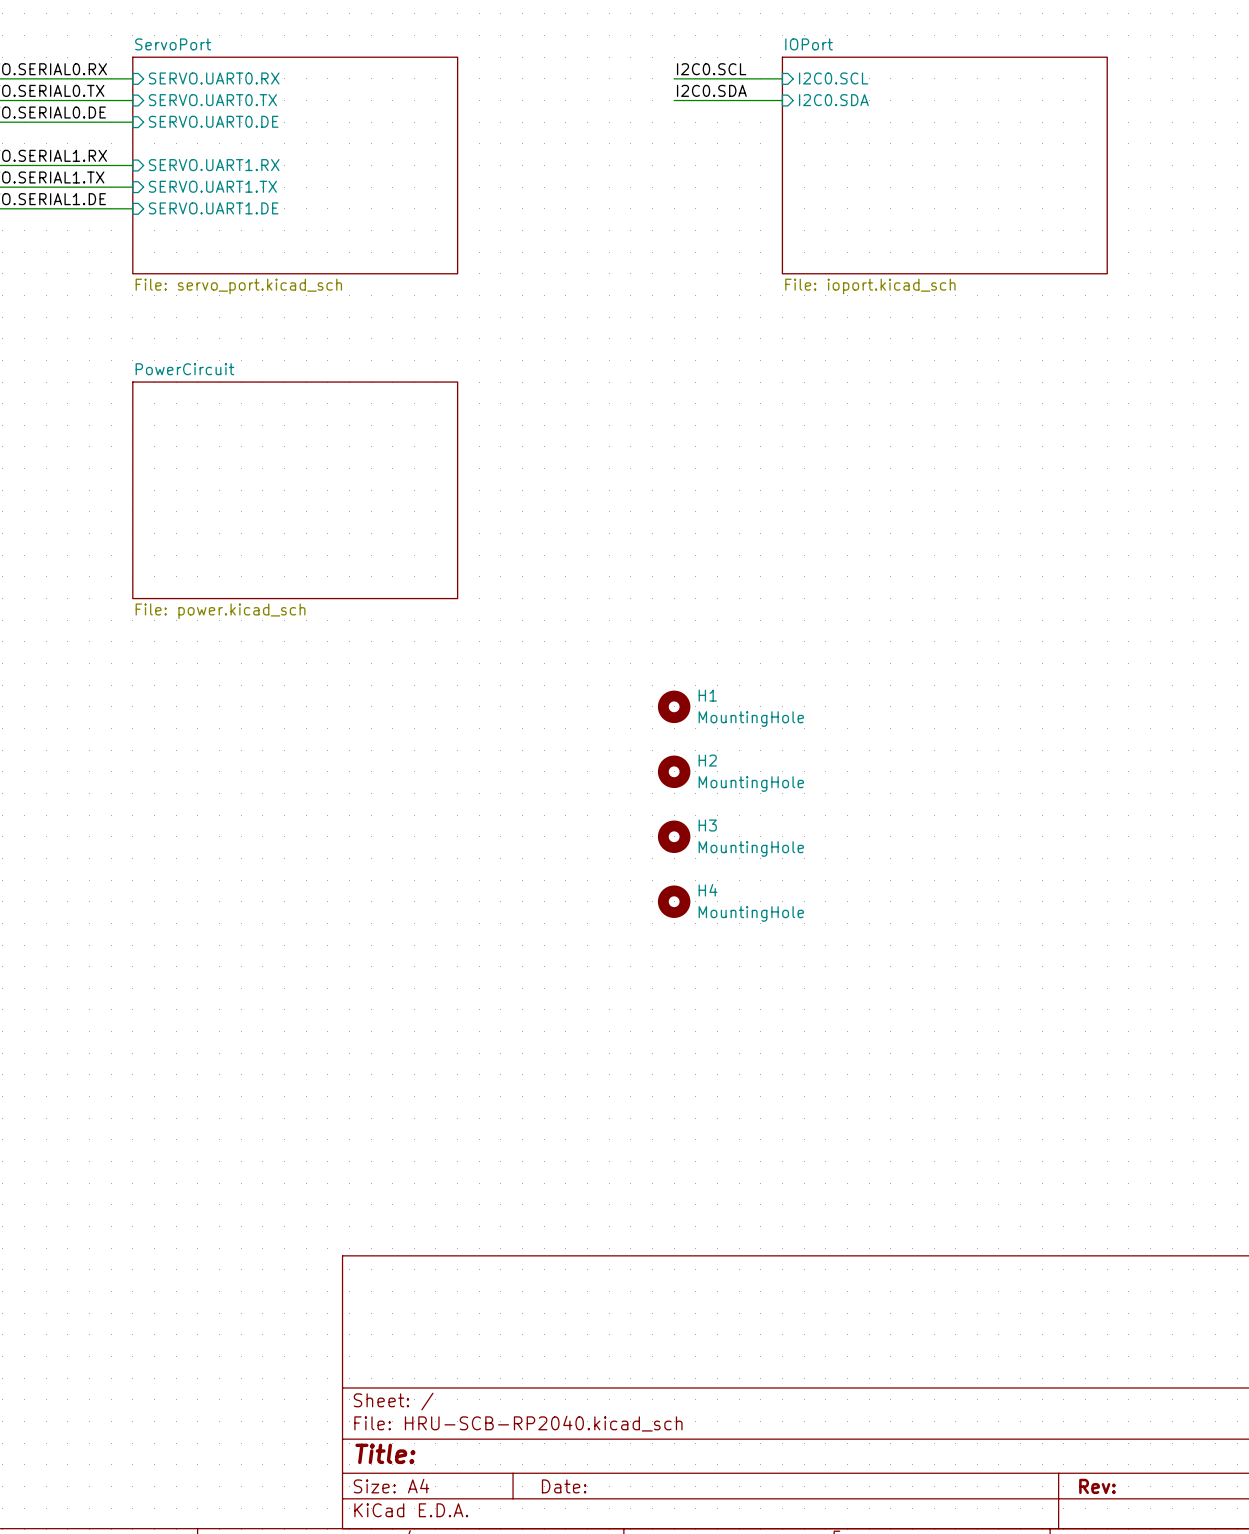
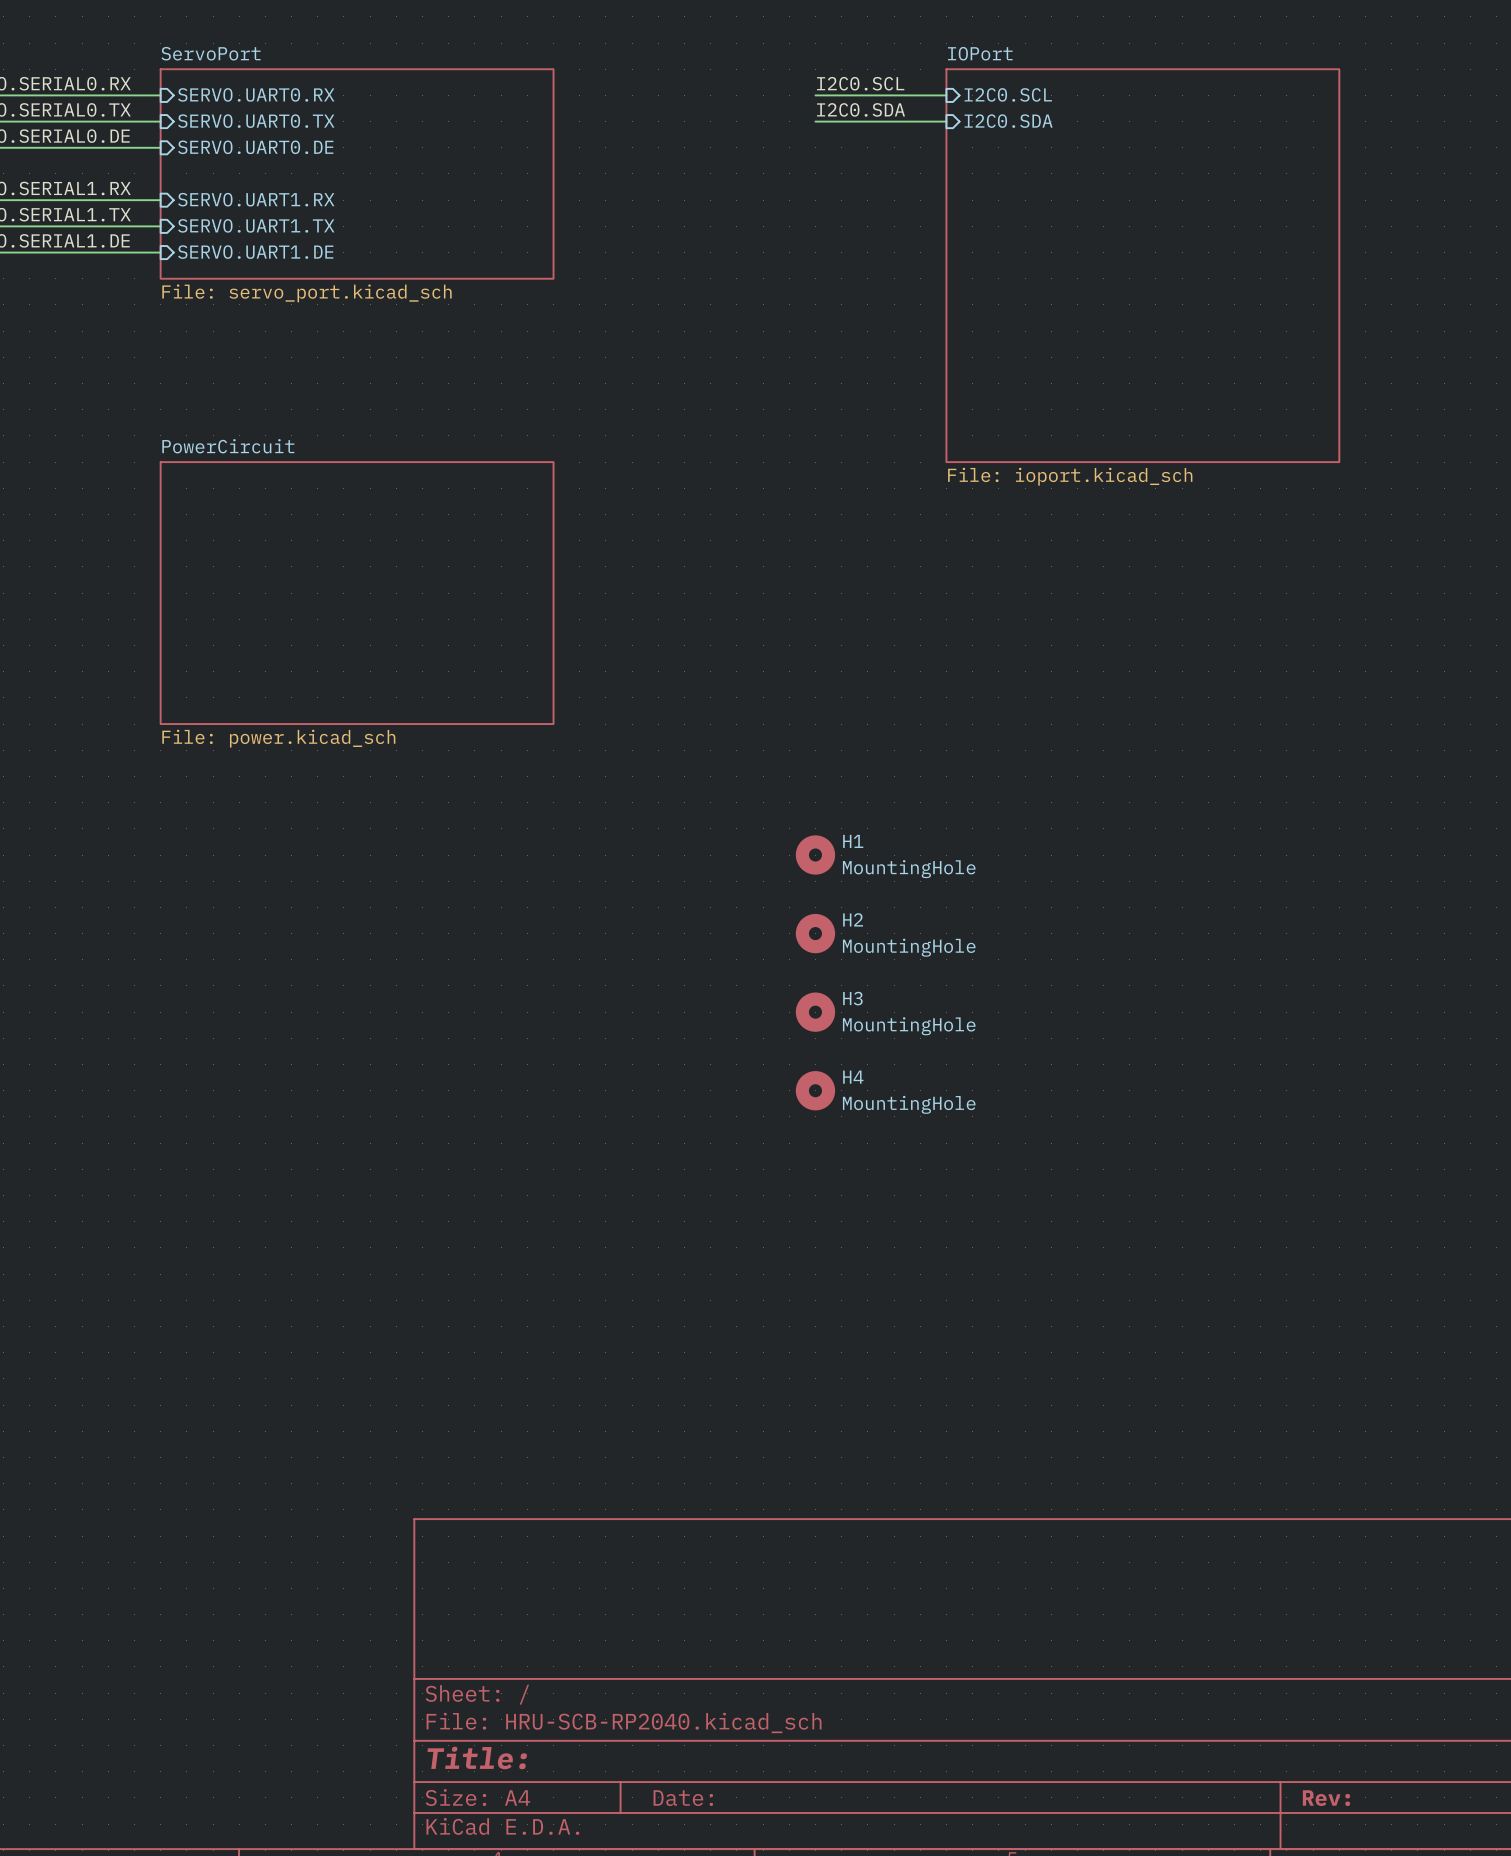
sheet ServoPort: none -> File: servo_port.kicad_sch (357, 173)
sheet ServoPort: File: servo_port.kicad_sch (295, 165) -> none
sheet IOPort: File: ioport.kicad_sch (944, 165) -> none
sheet IOPort: none -> File: ioport.kicad_sch (1142, 265)

